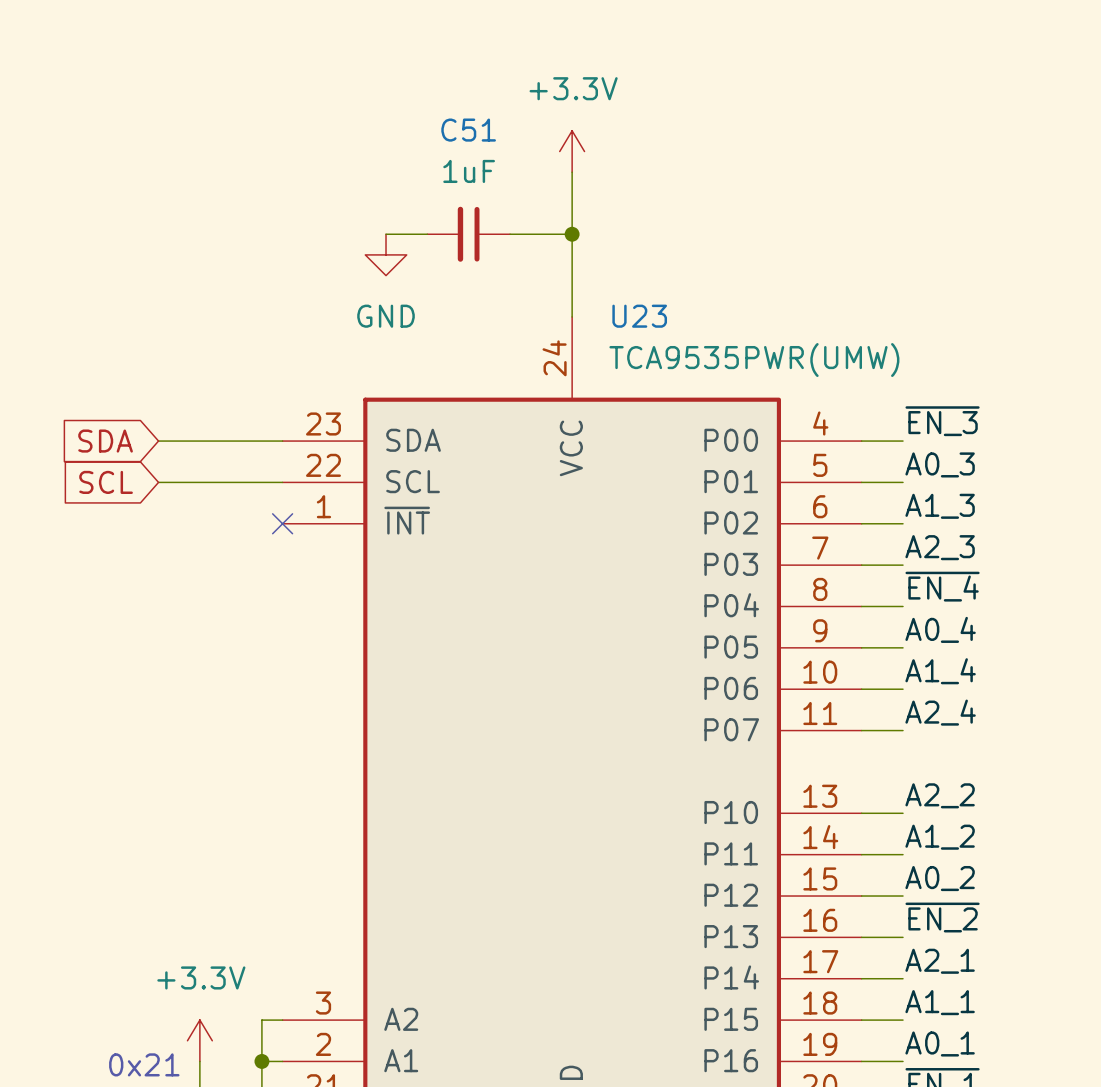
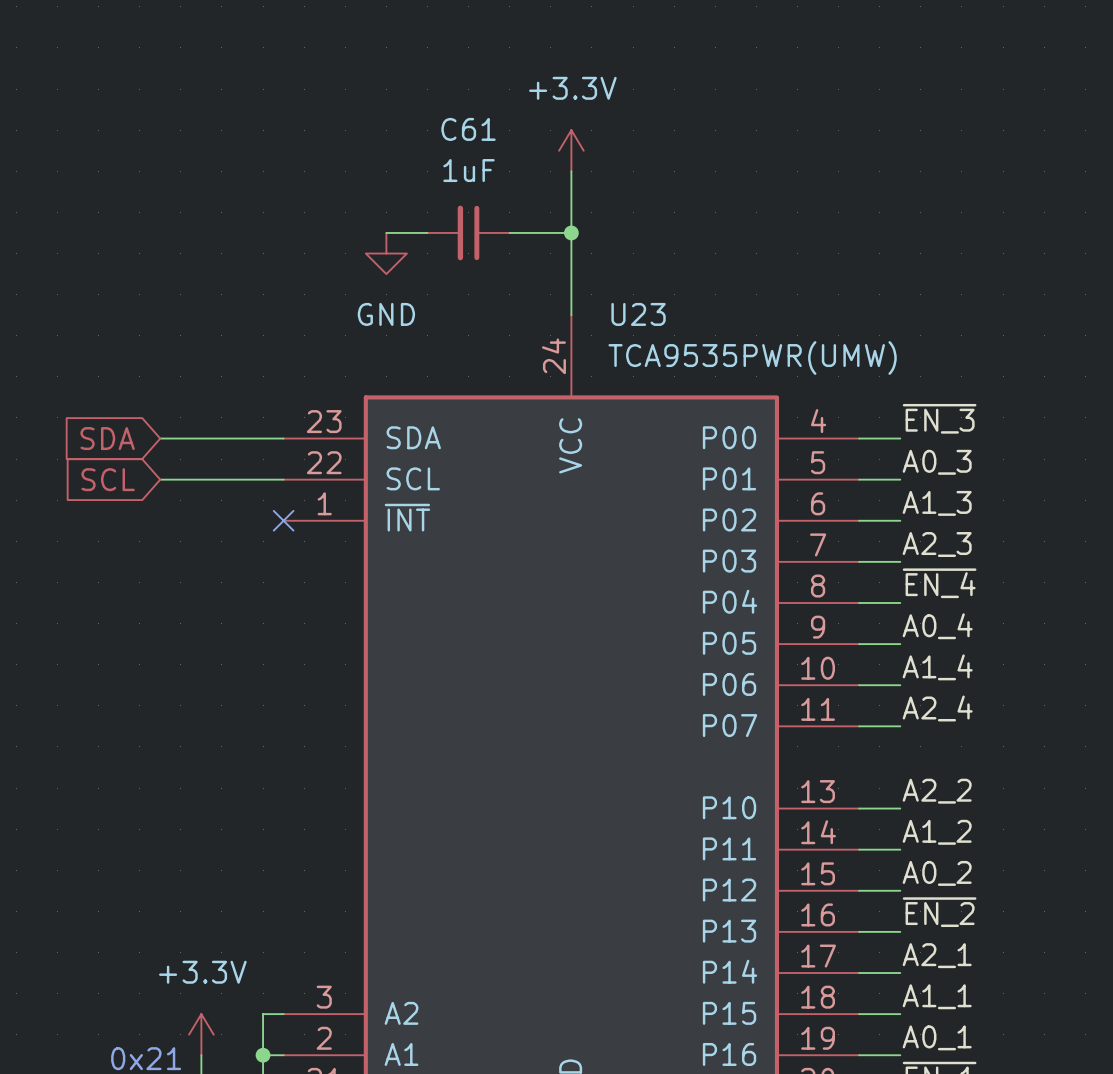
C51 name: C51 (468, 130) -> C61 (468, 129)

